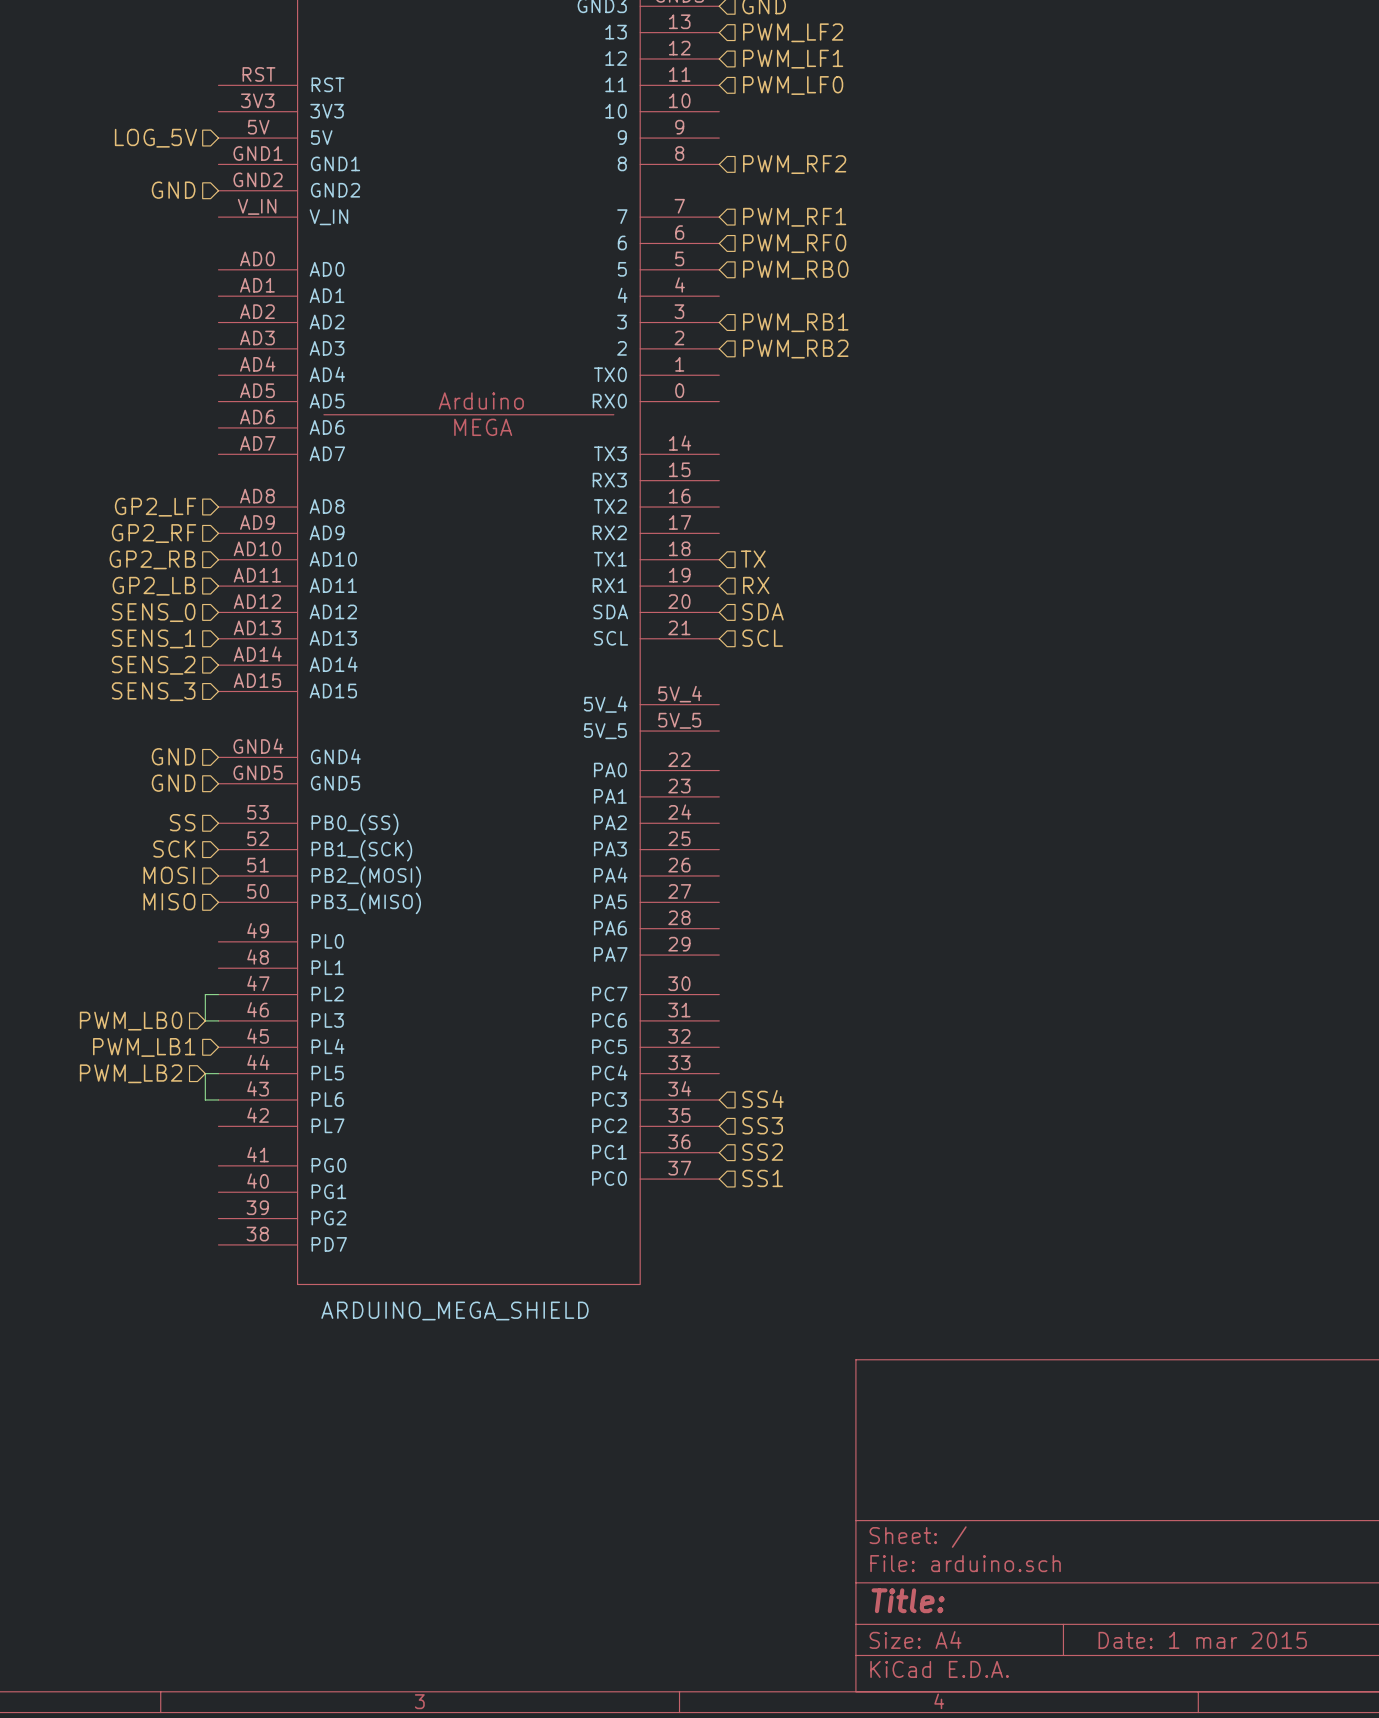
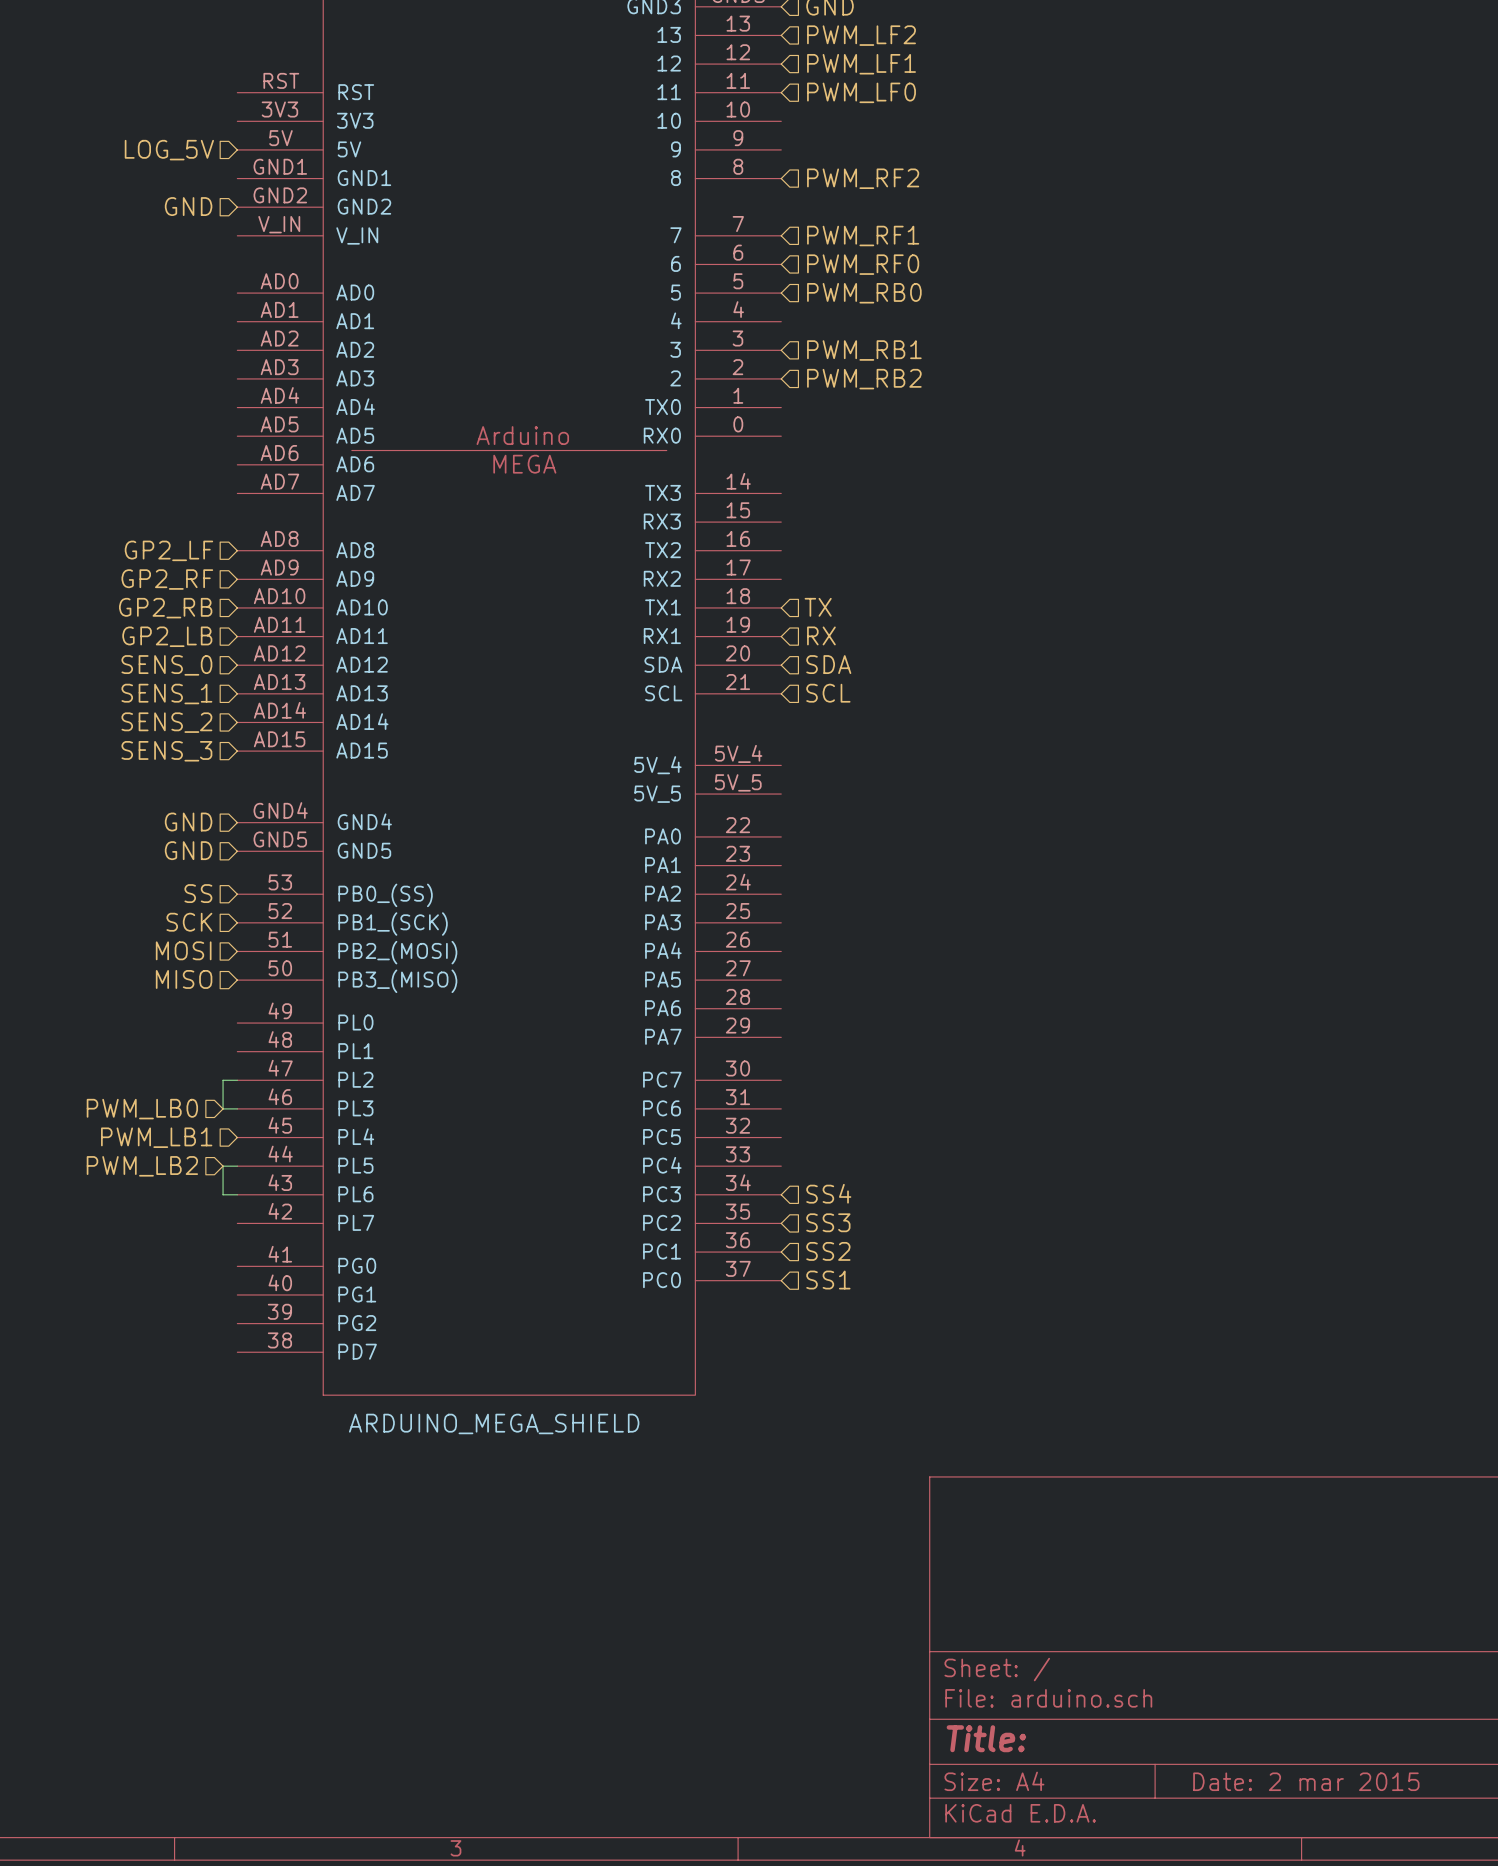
title block: Date: 1 mar 2015 (1202, 1640) -> Date: 2 mar 2015 (1306, 1781)

